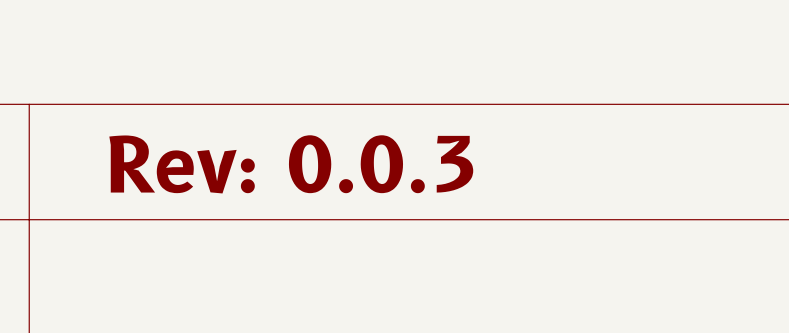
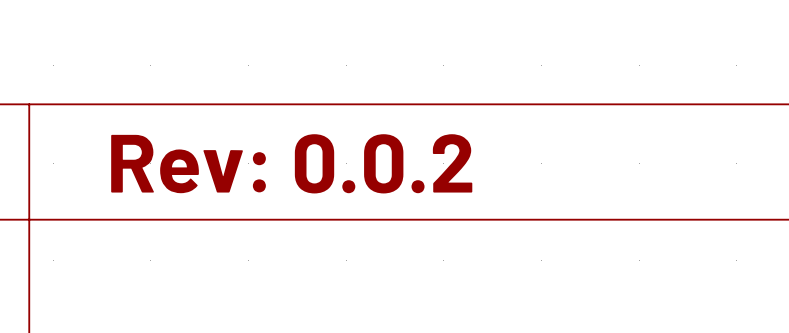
title block: Rev: 0.0.3 (291, 164) -> Rev: 0.0.2 (291, 163)

